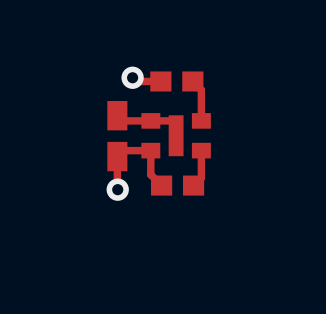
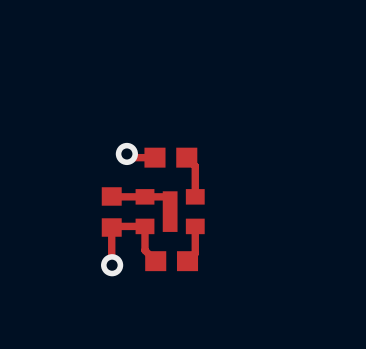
part footprint: [107, 100, 128, 172] -> [101, 187, 122, 237]

